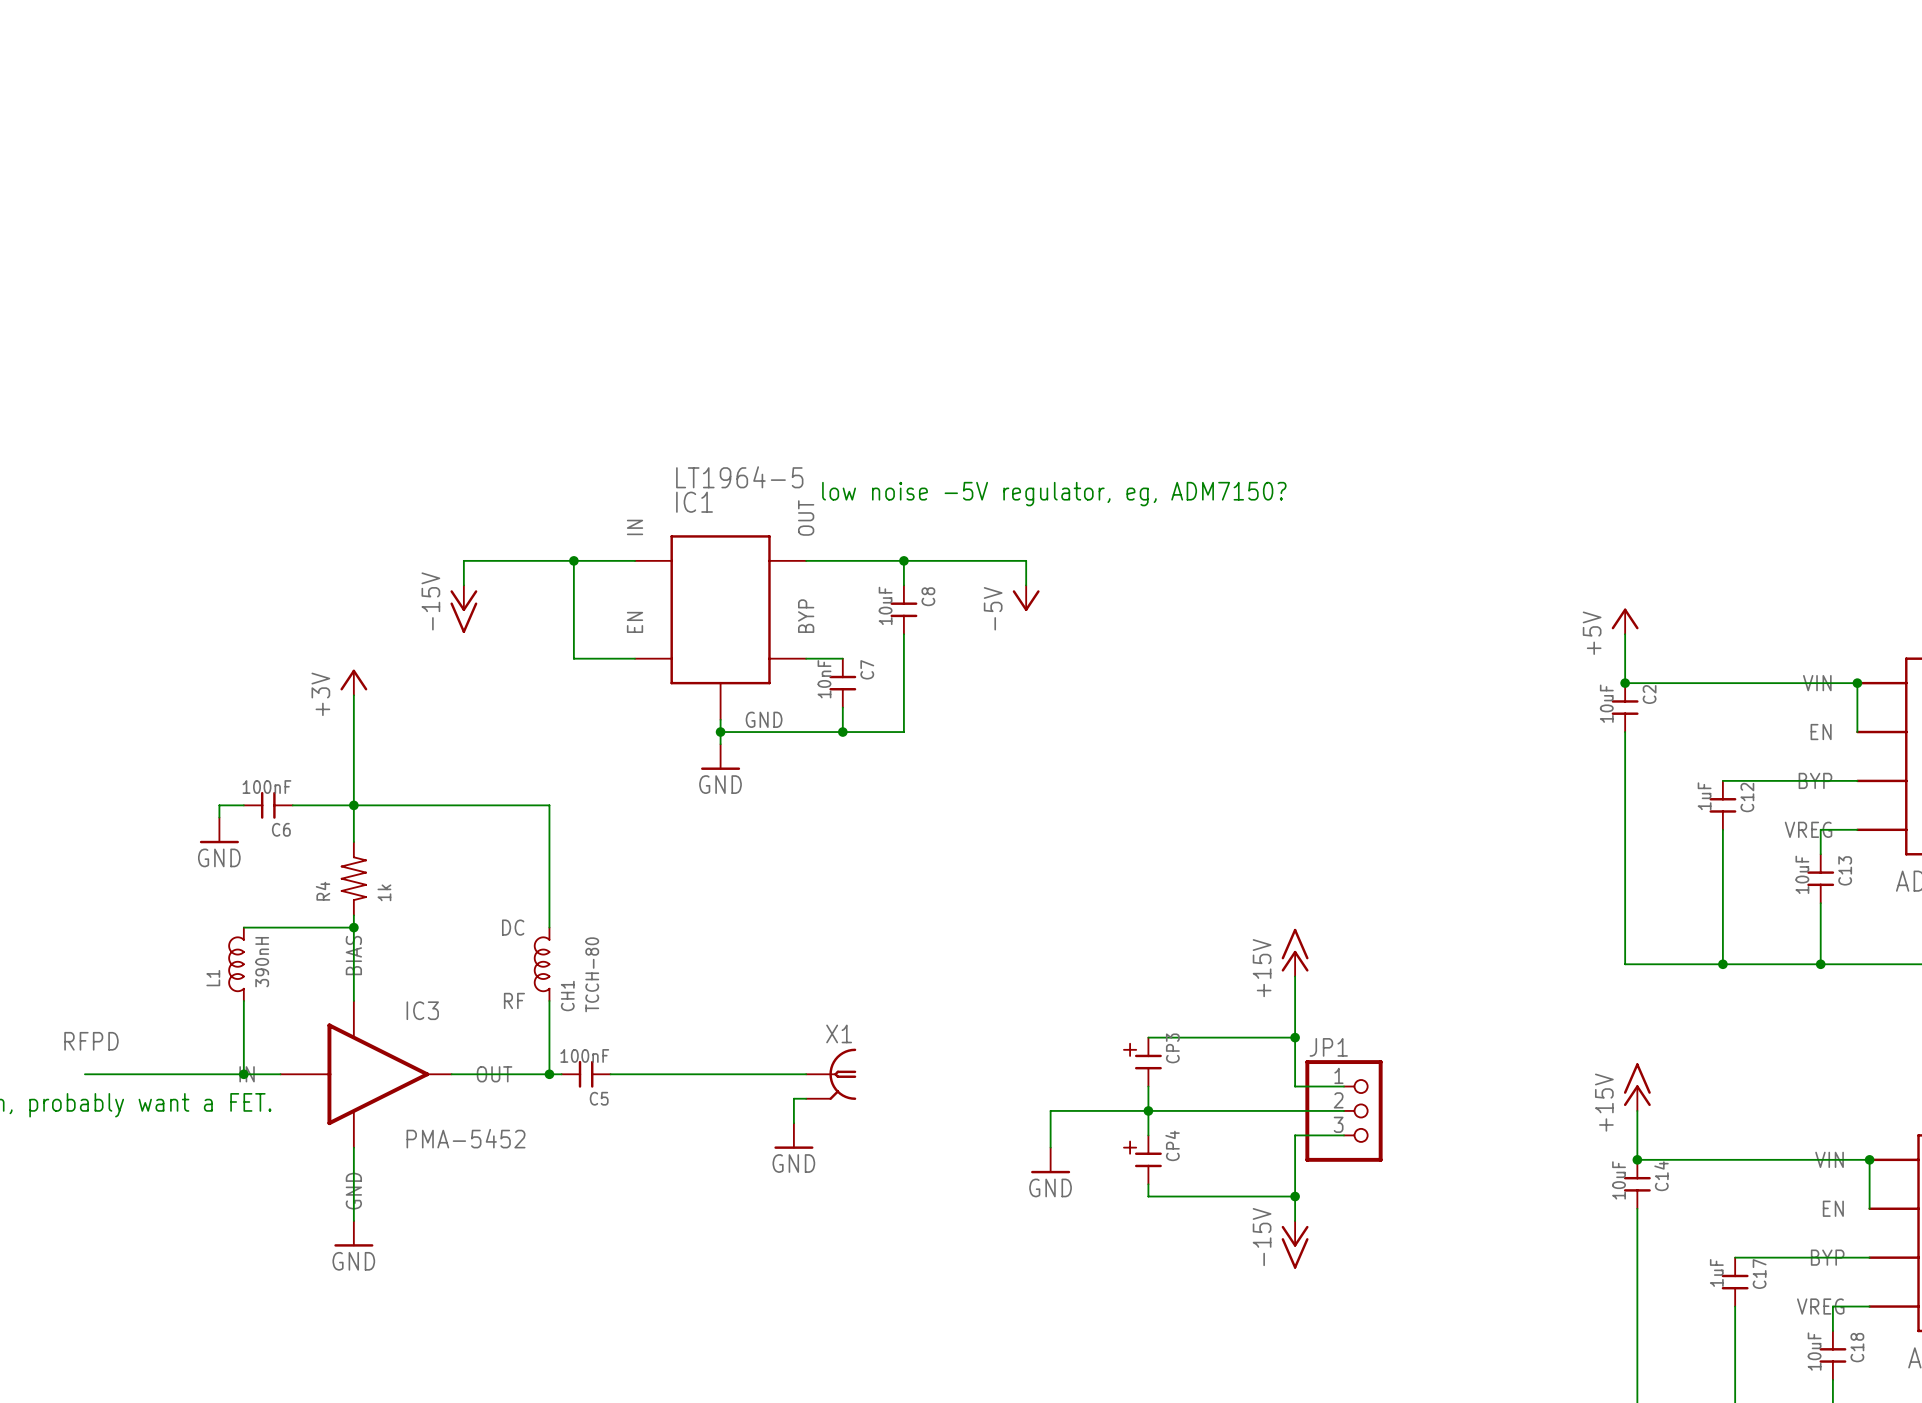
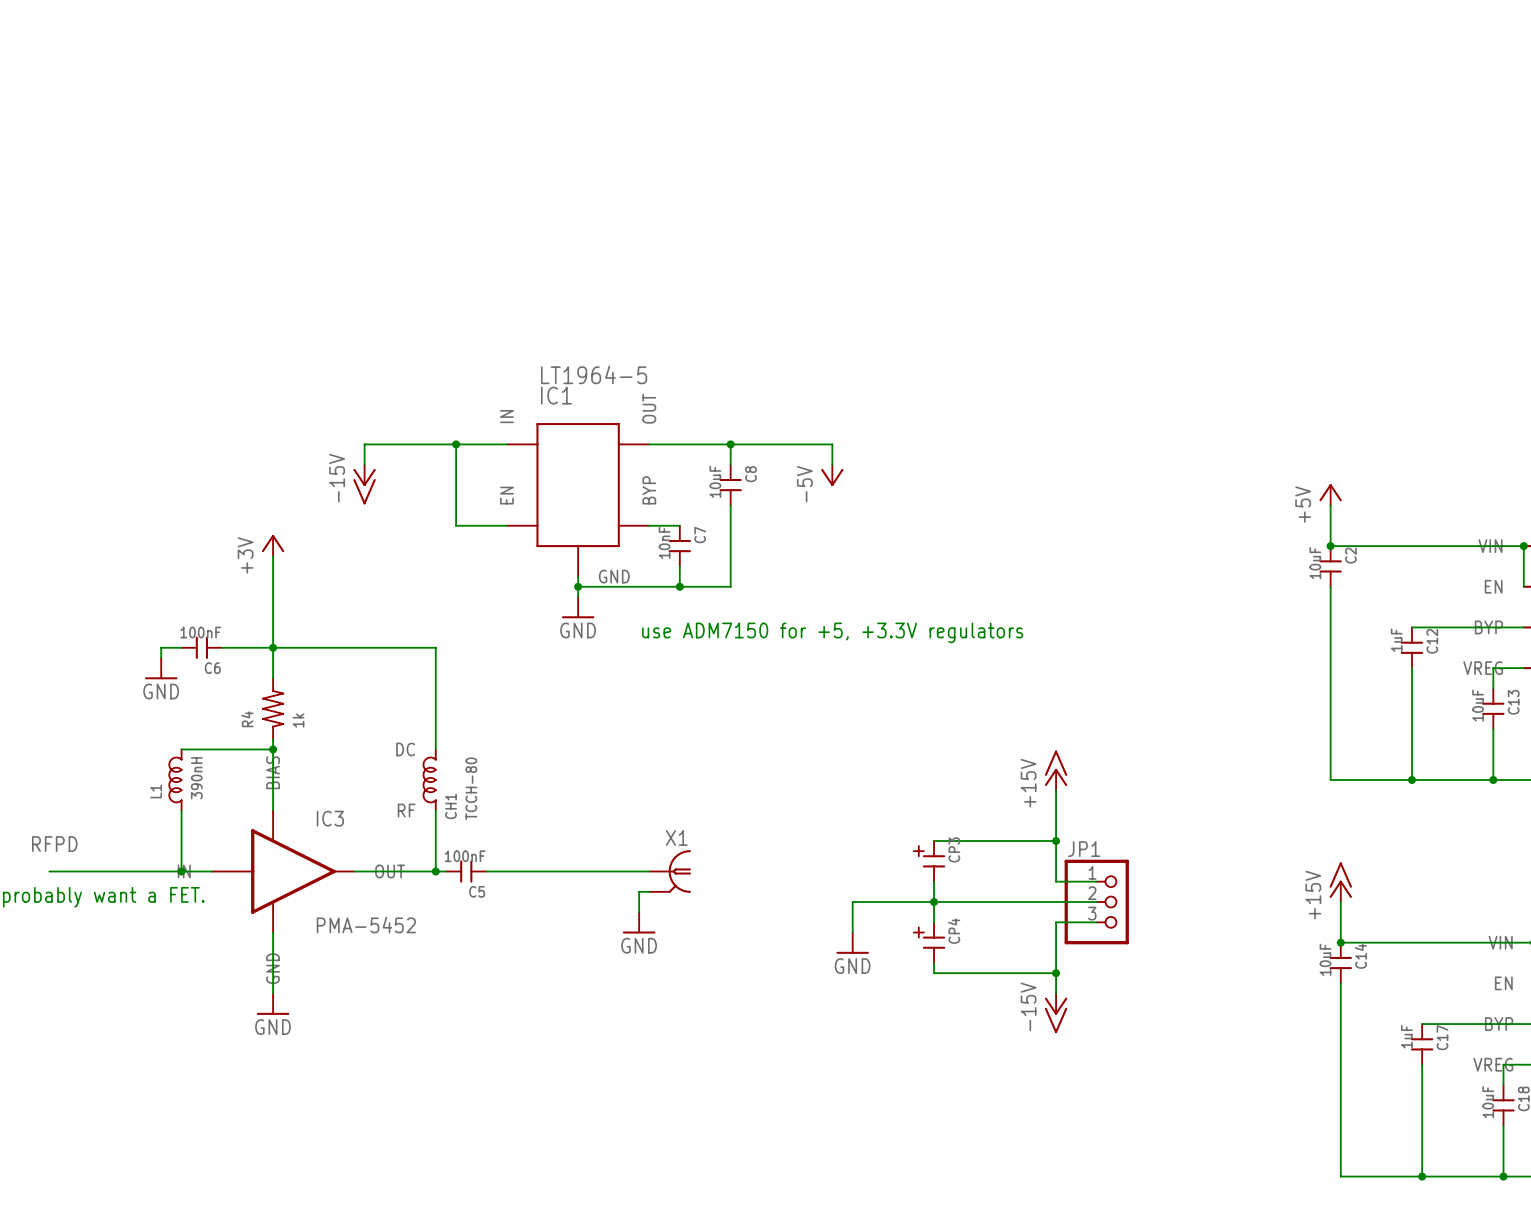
text: low noise -5V regulator, eg, ADM7150? (1054, 494) -> none
text: none -> use ADM7150 for +5, +3.3V regulators (832, 632)

